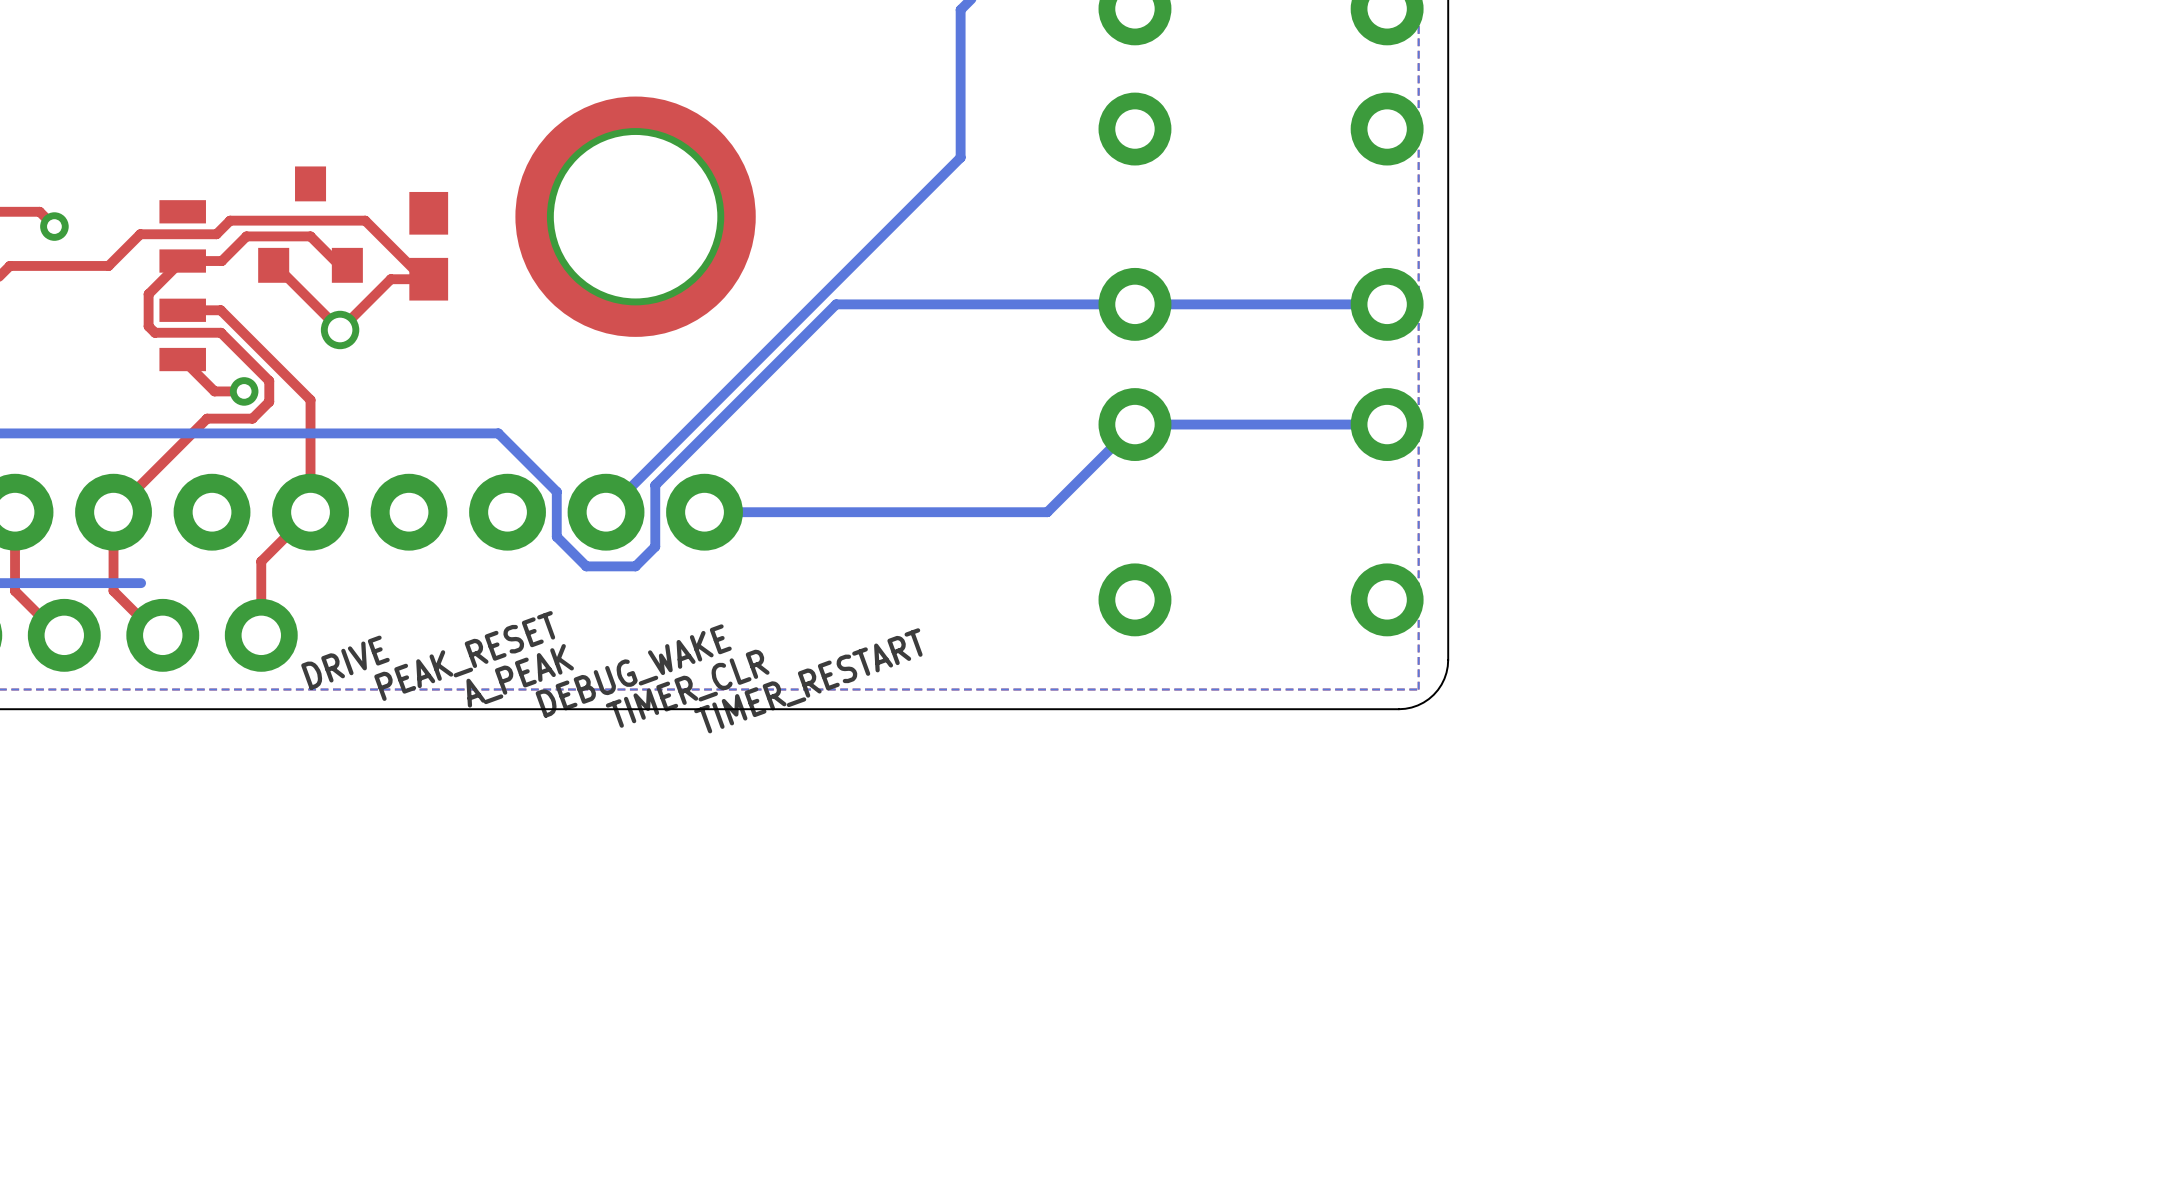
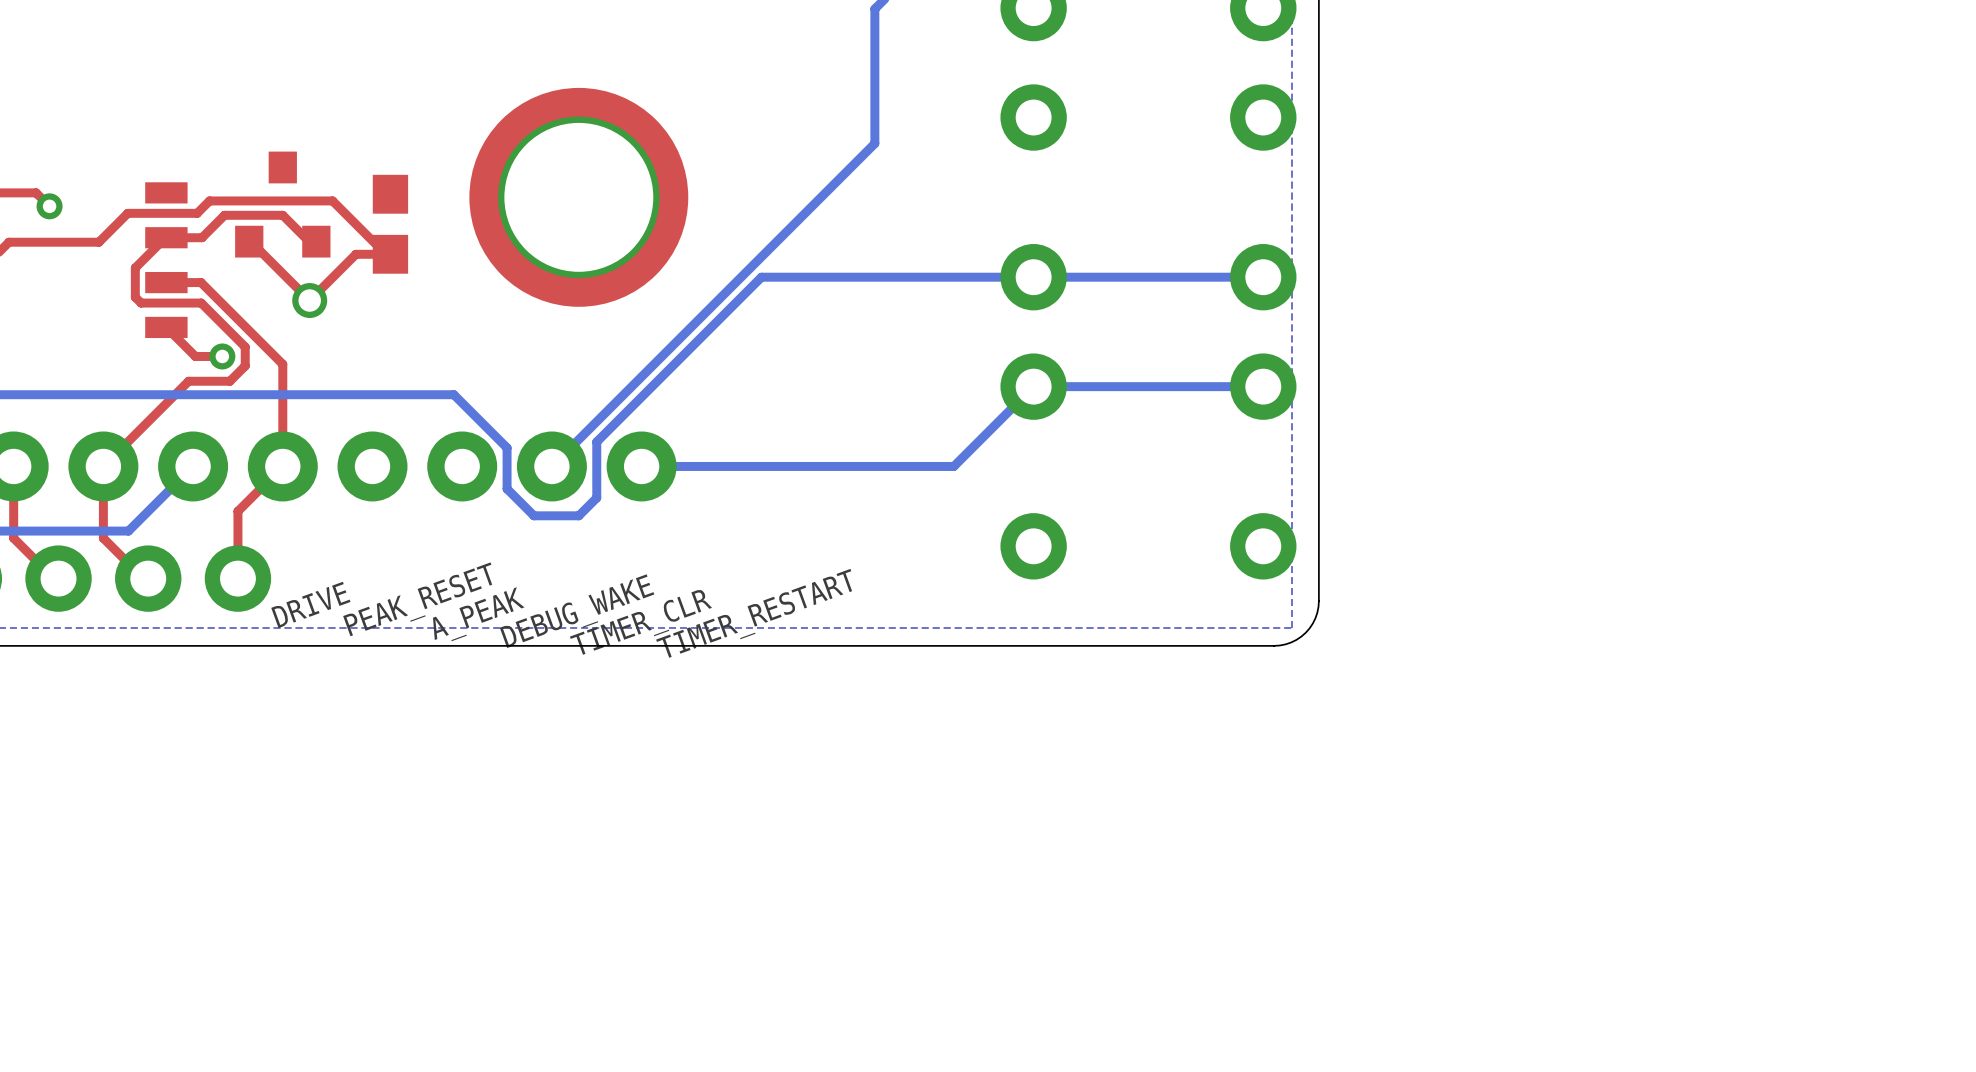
bottom track: none -> (193, 466) (128, 531)

